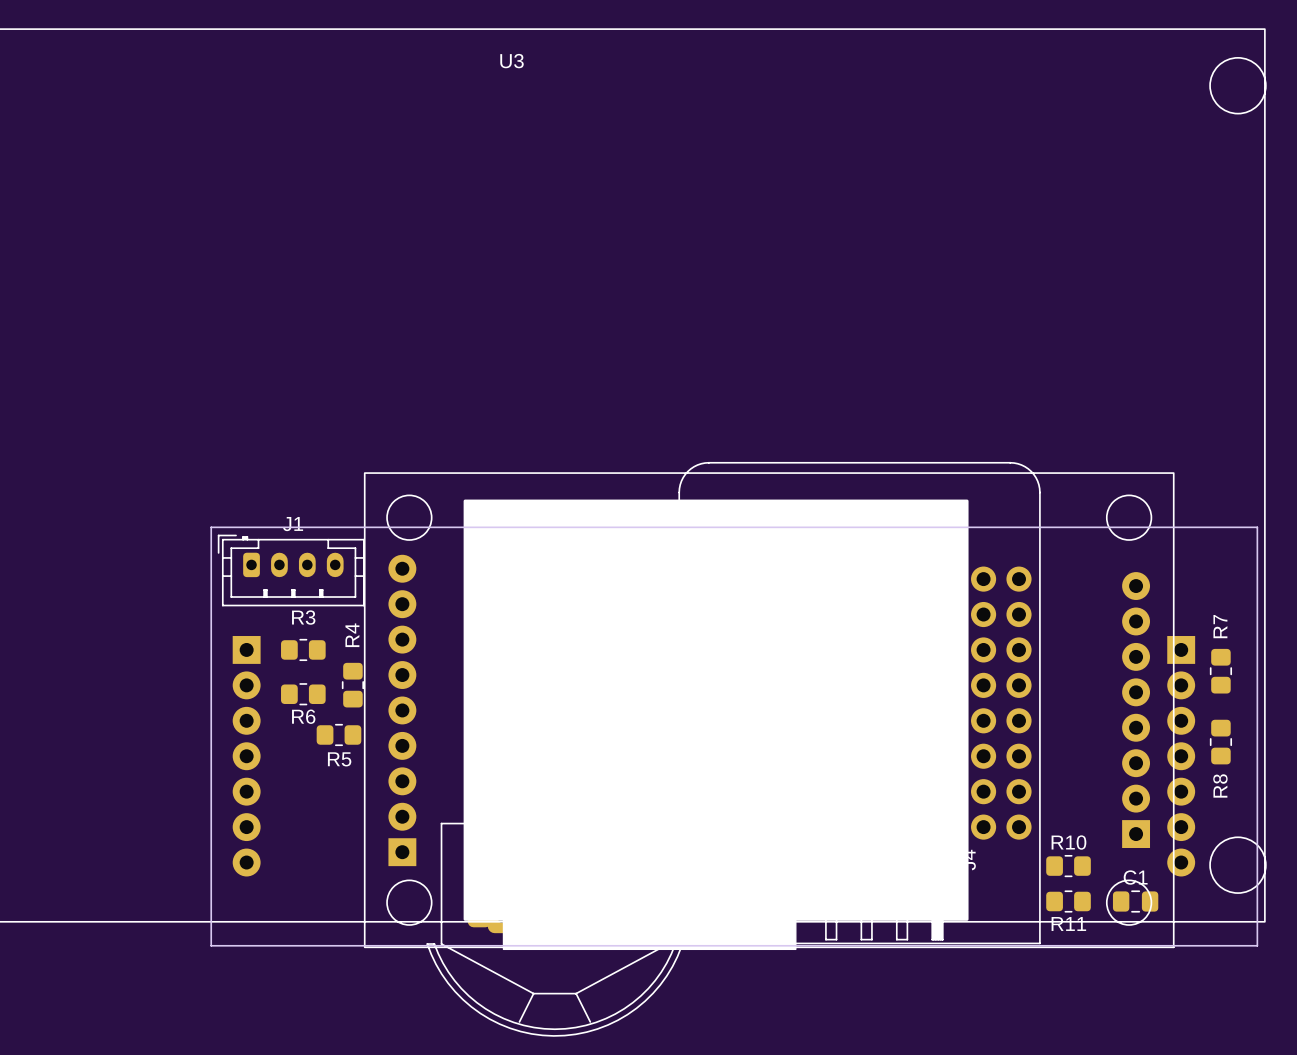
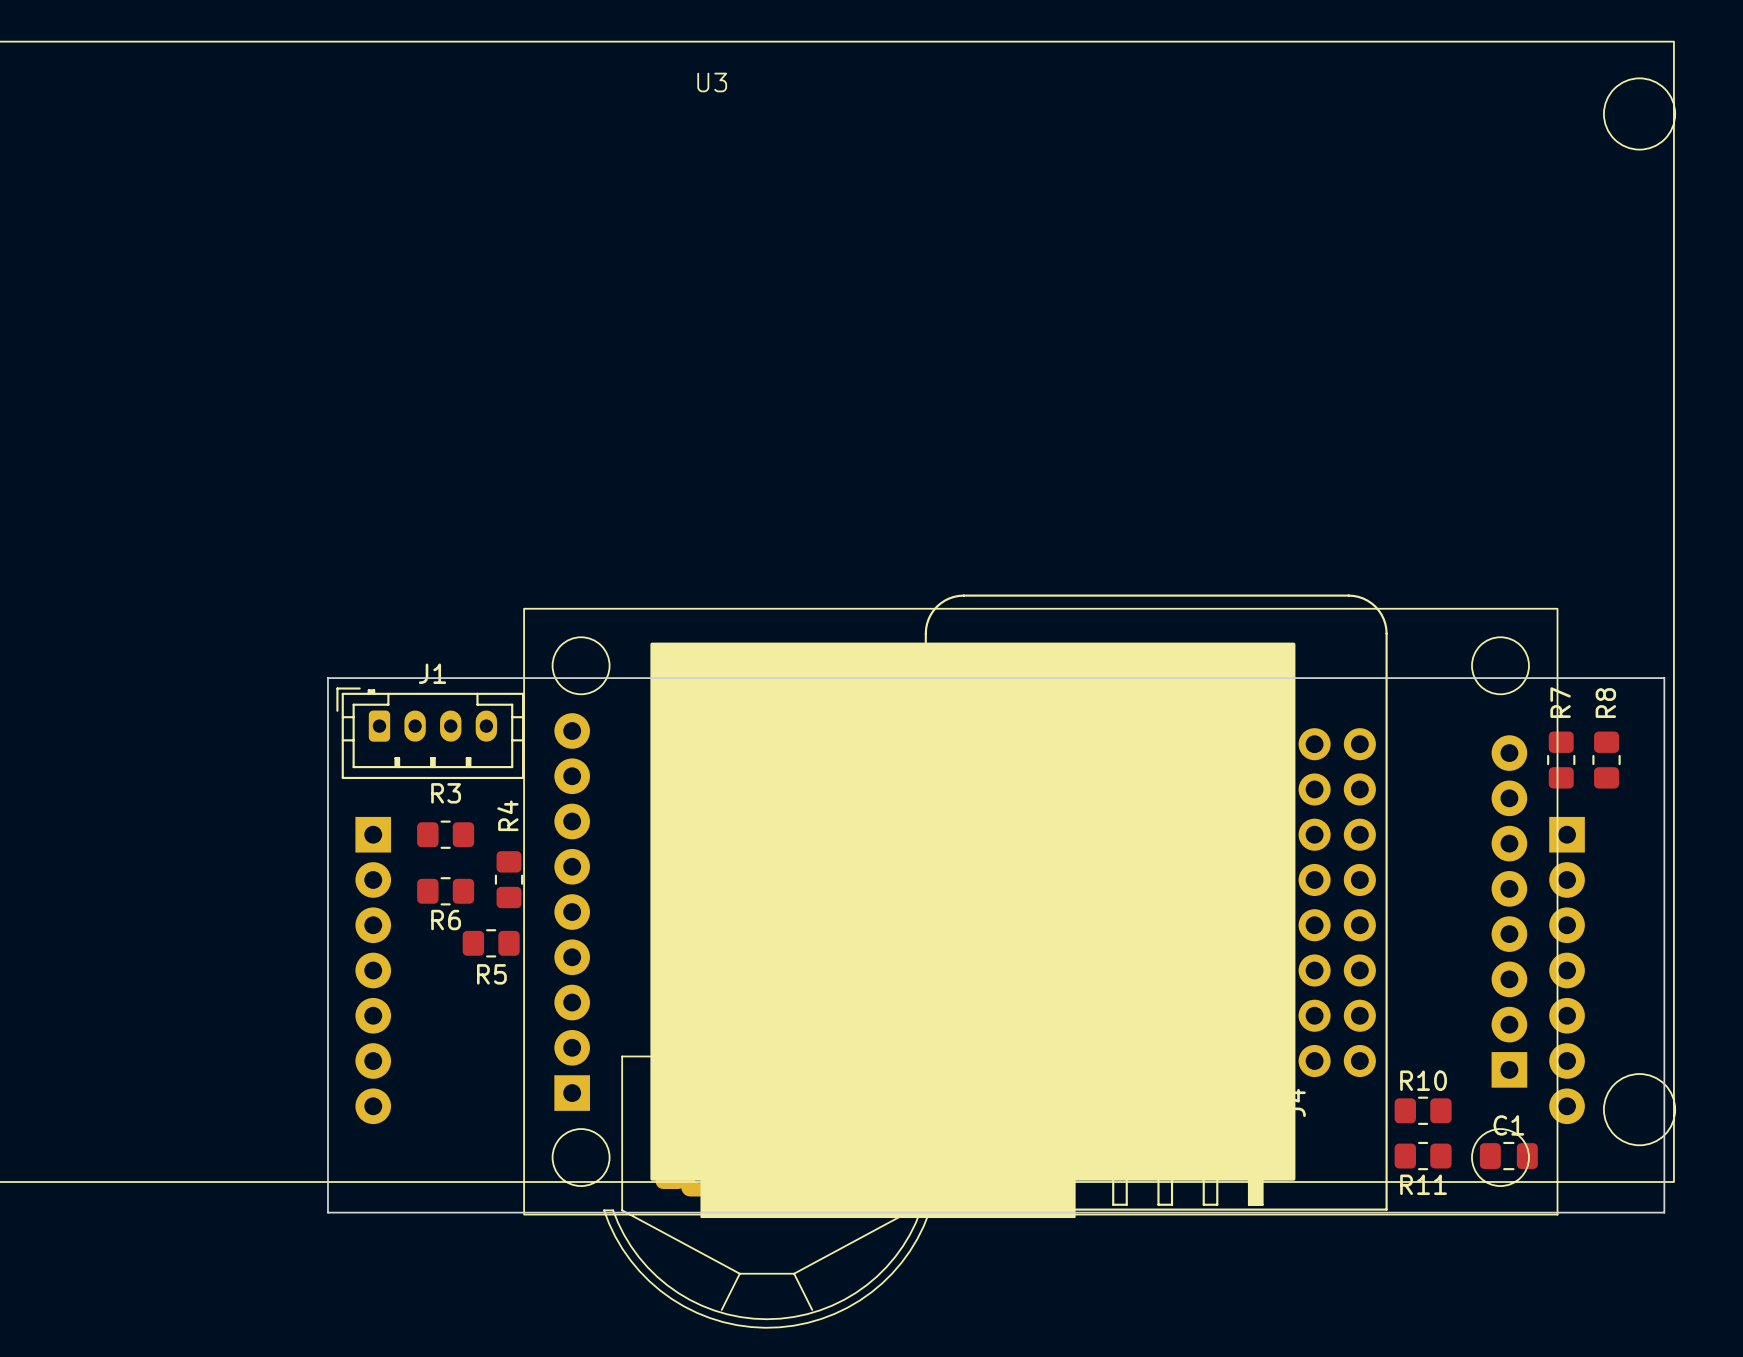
R7 position: (1220, 671) -> (1561, 760)
R8 position: (1220, 742) -> (1606, 760)
R8 name position: R8 (1220, 785) -> R8 (1605, 703)

